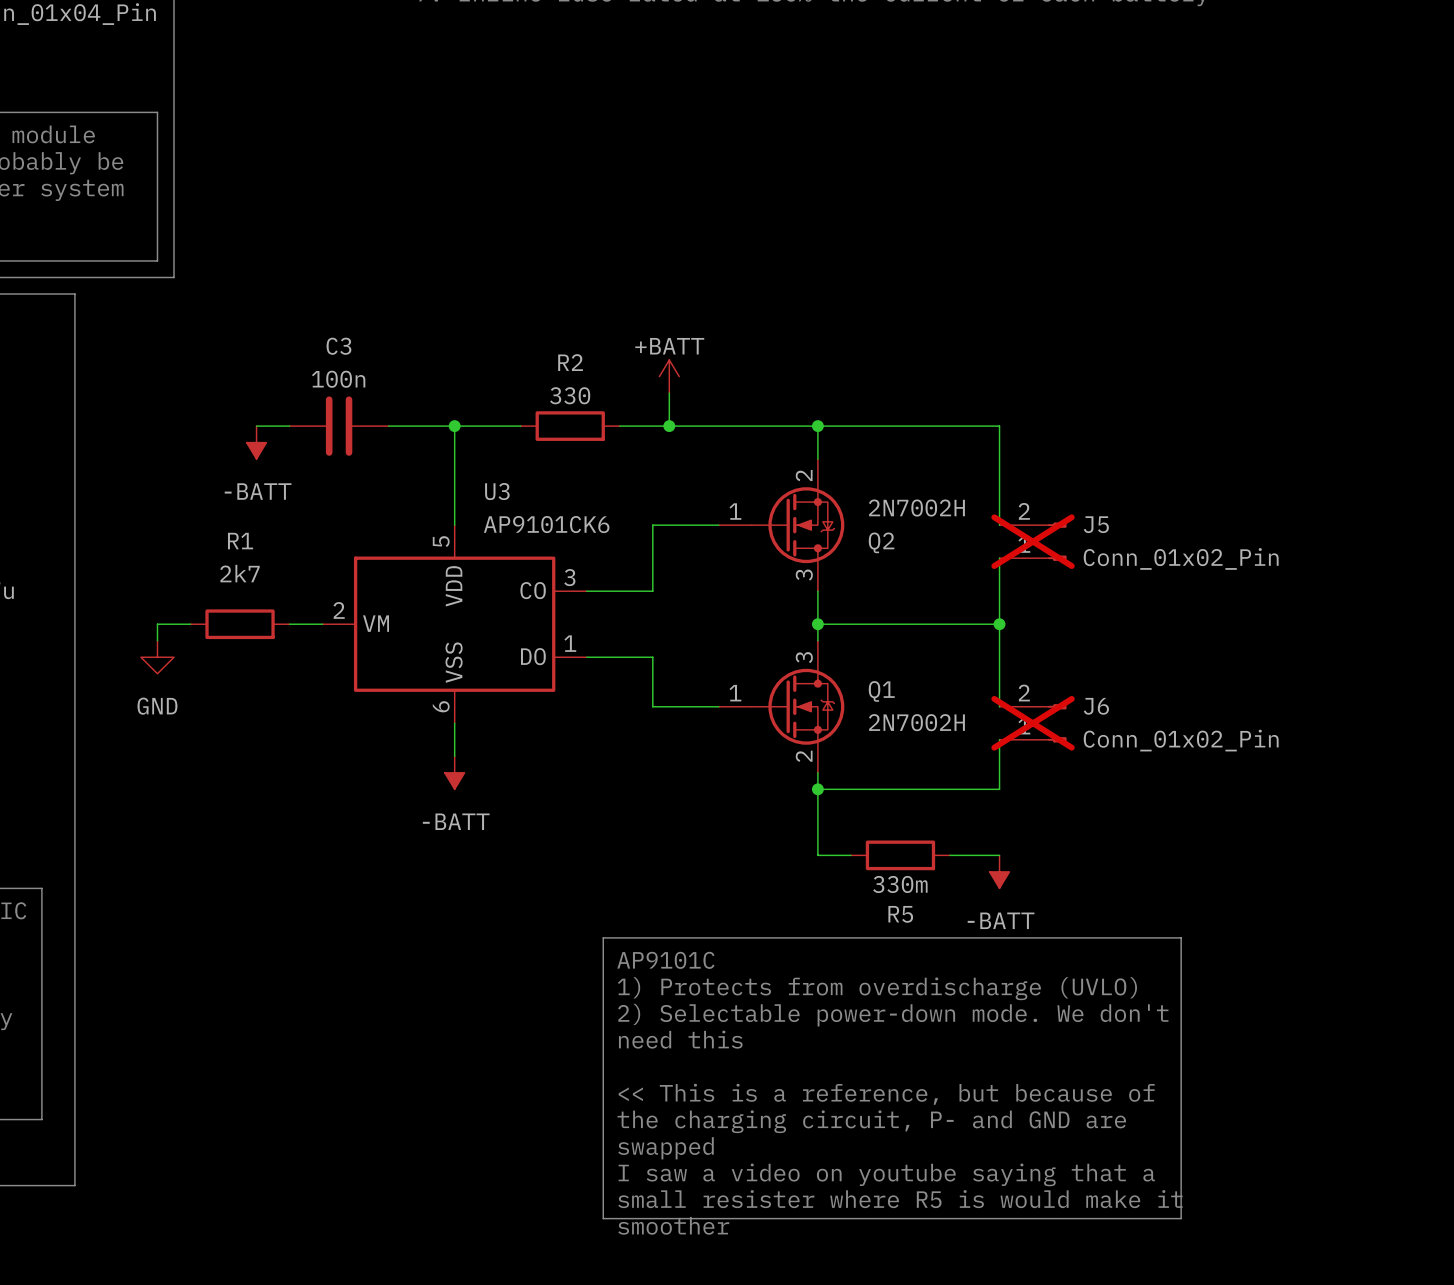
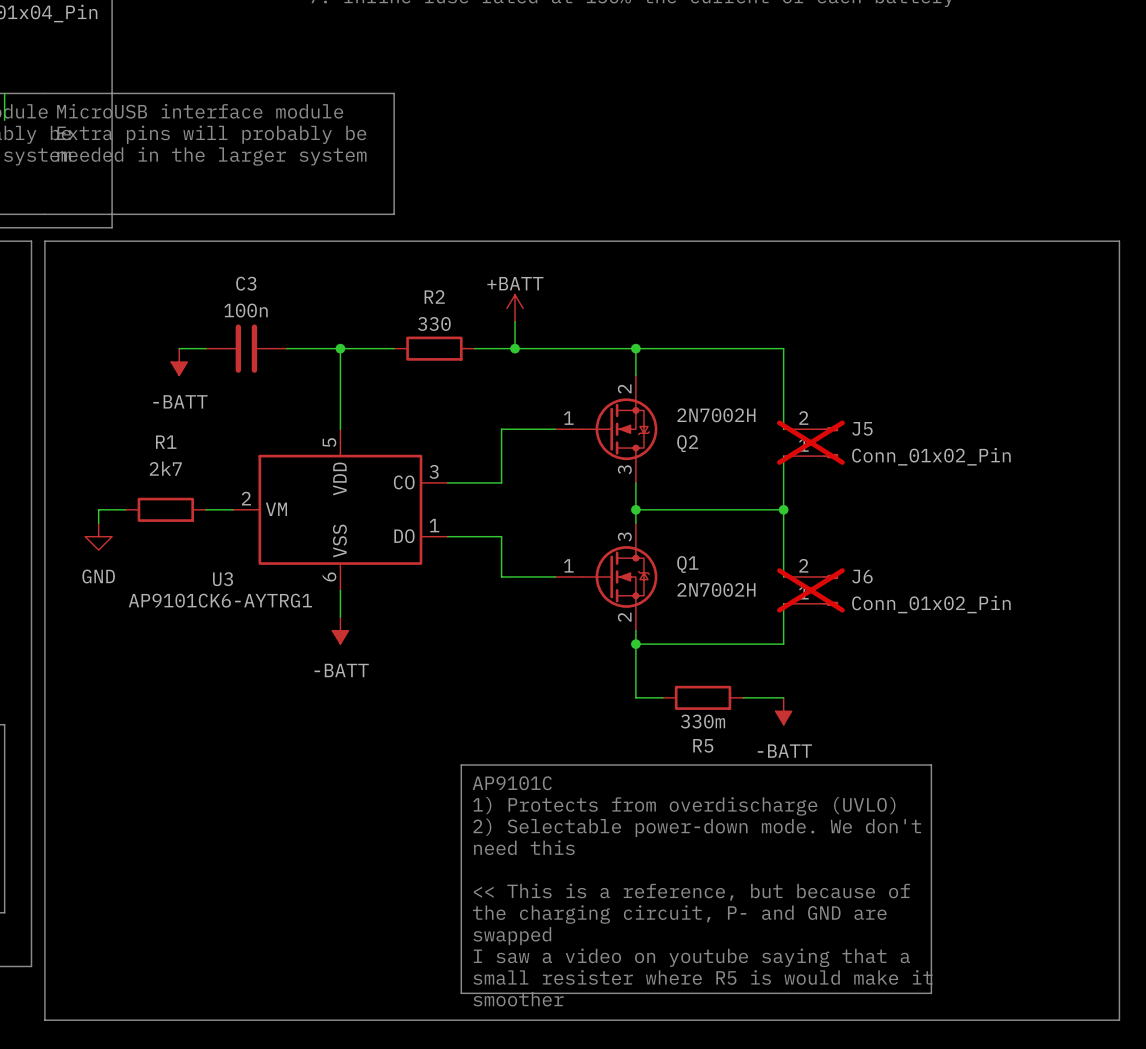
wire: none -> (4, 93) (4, 120)
line: (157, 112) (157, 260) -> (98, 93) (394, 93) (394, 214) (98, 214)
text: none -> MicroUSB interface module (200, 111)
text: none -> Extra pins will probably be (211, 134)
text: none -> needed in the larger system (212, 156)
line: none -> (44, 241) (1119, 241) (1119, 1020) (44, 1020) (44, 241)
U3 name position: U3 (497, 491) -> U3 (223, 579)
U3 value: AP9101CK6 (546, 524) -> AP9101CK6-AYTRG1 (220, 600)

